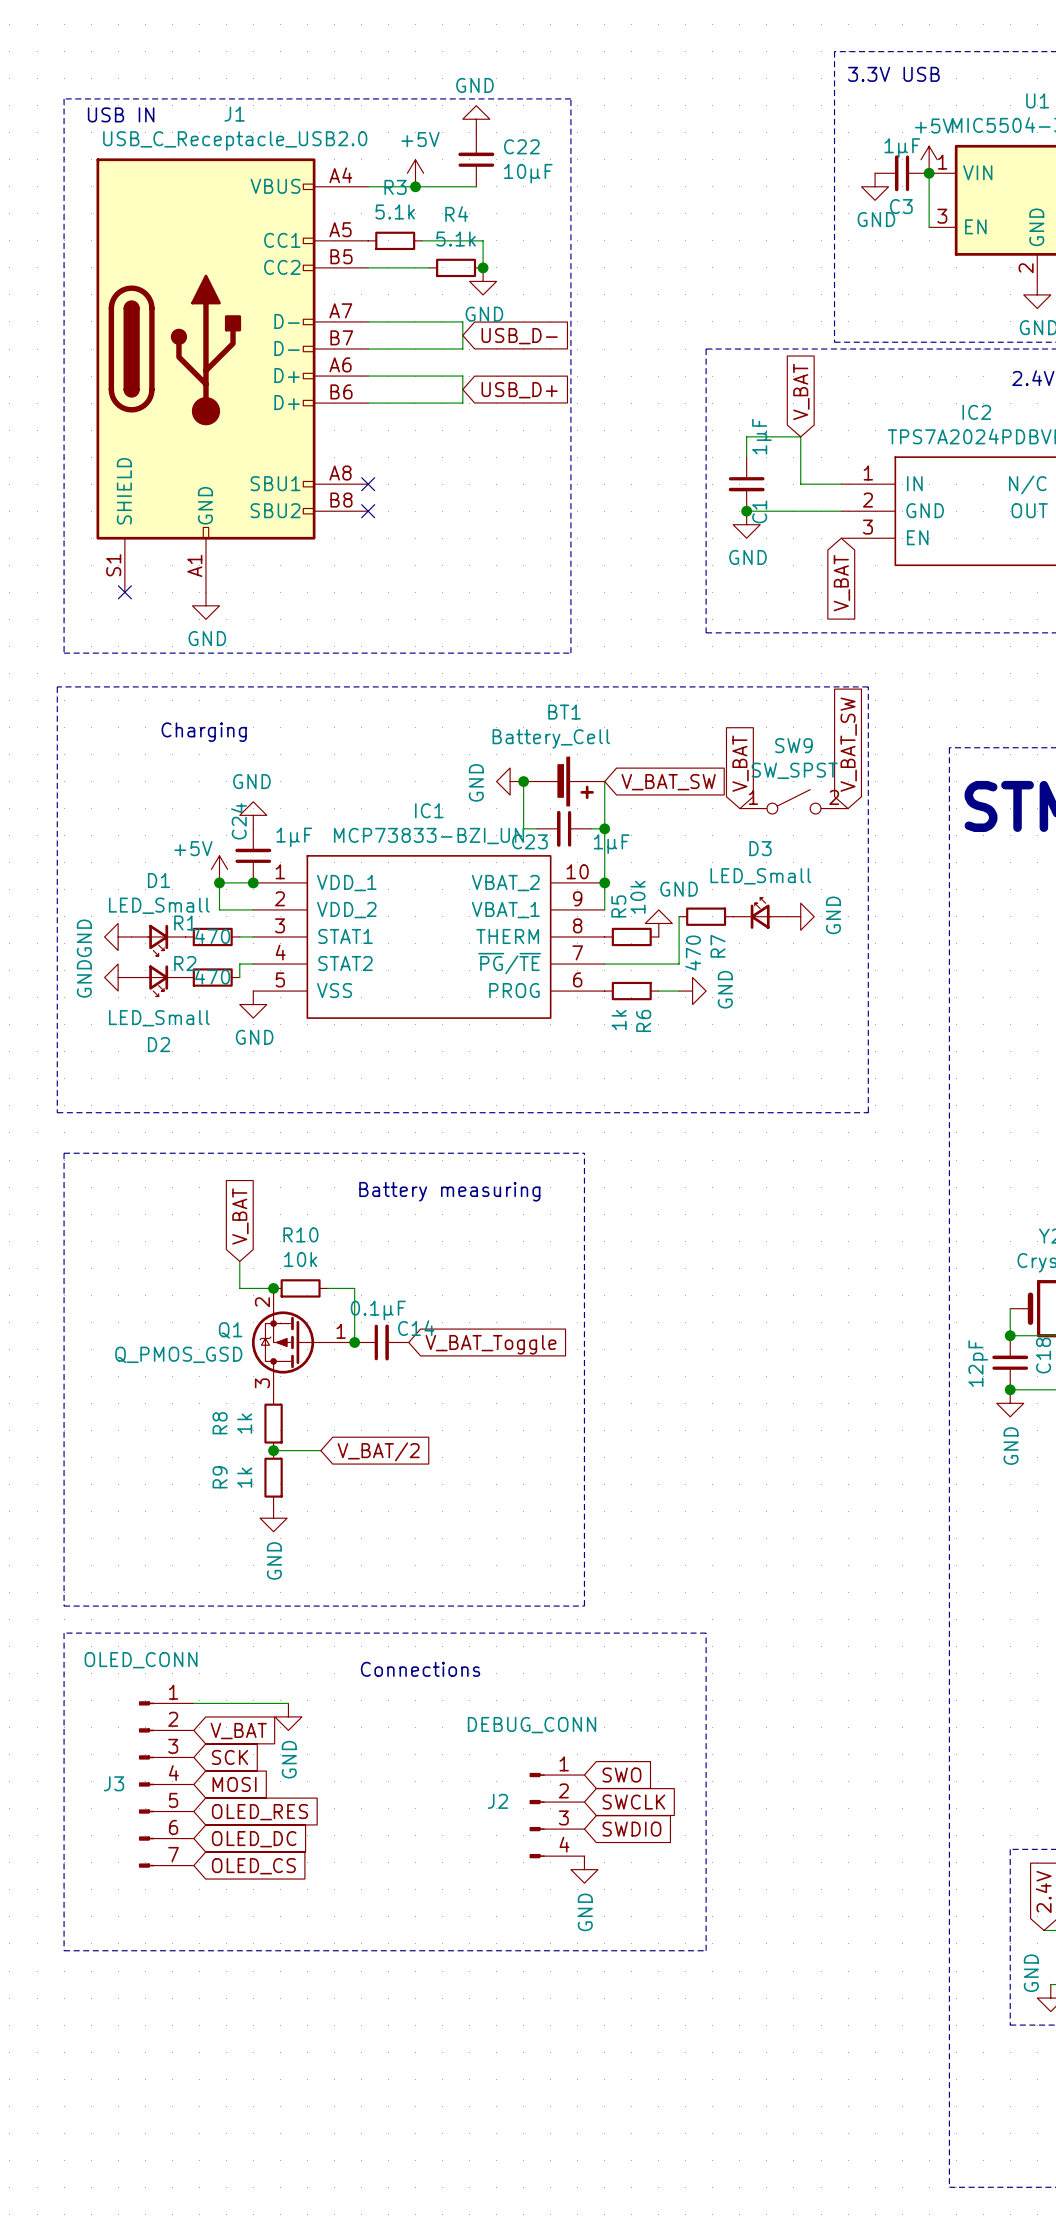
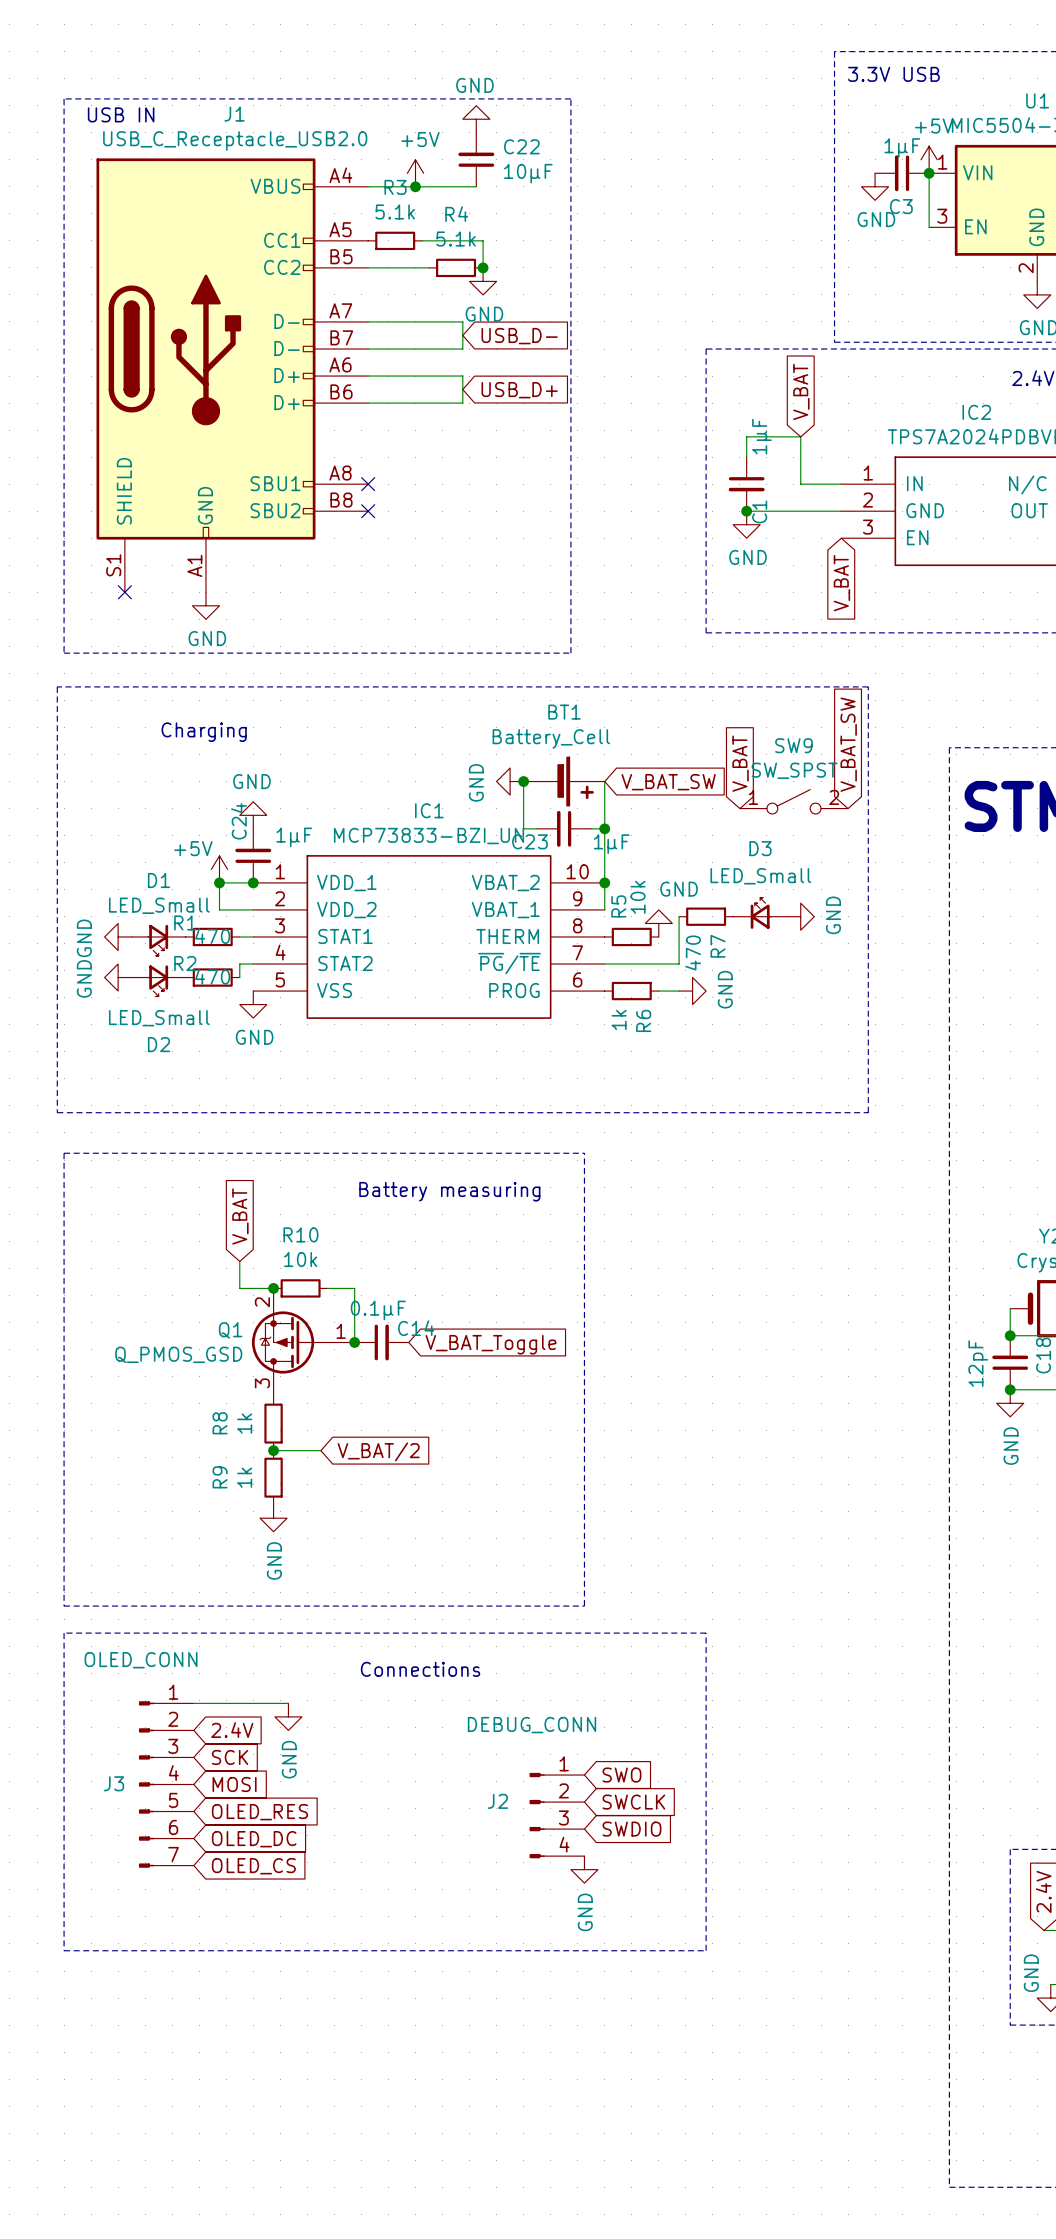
global label: V_BAT (238, 1731) -> 2.4V (232, 1730)

